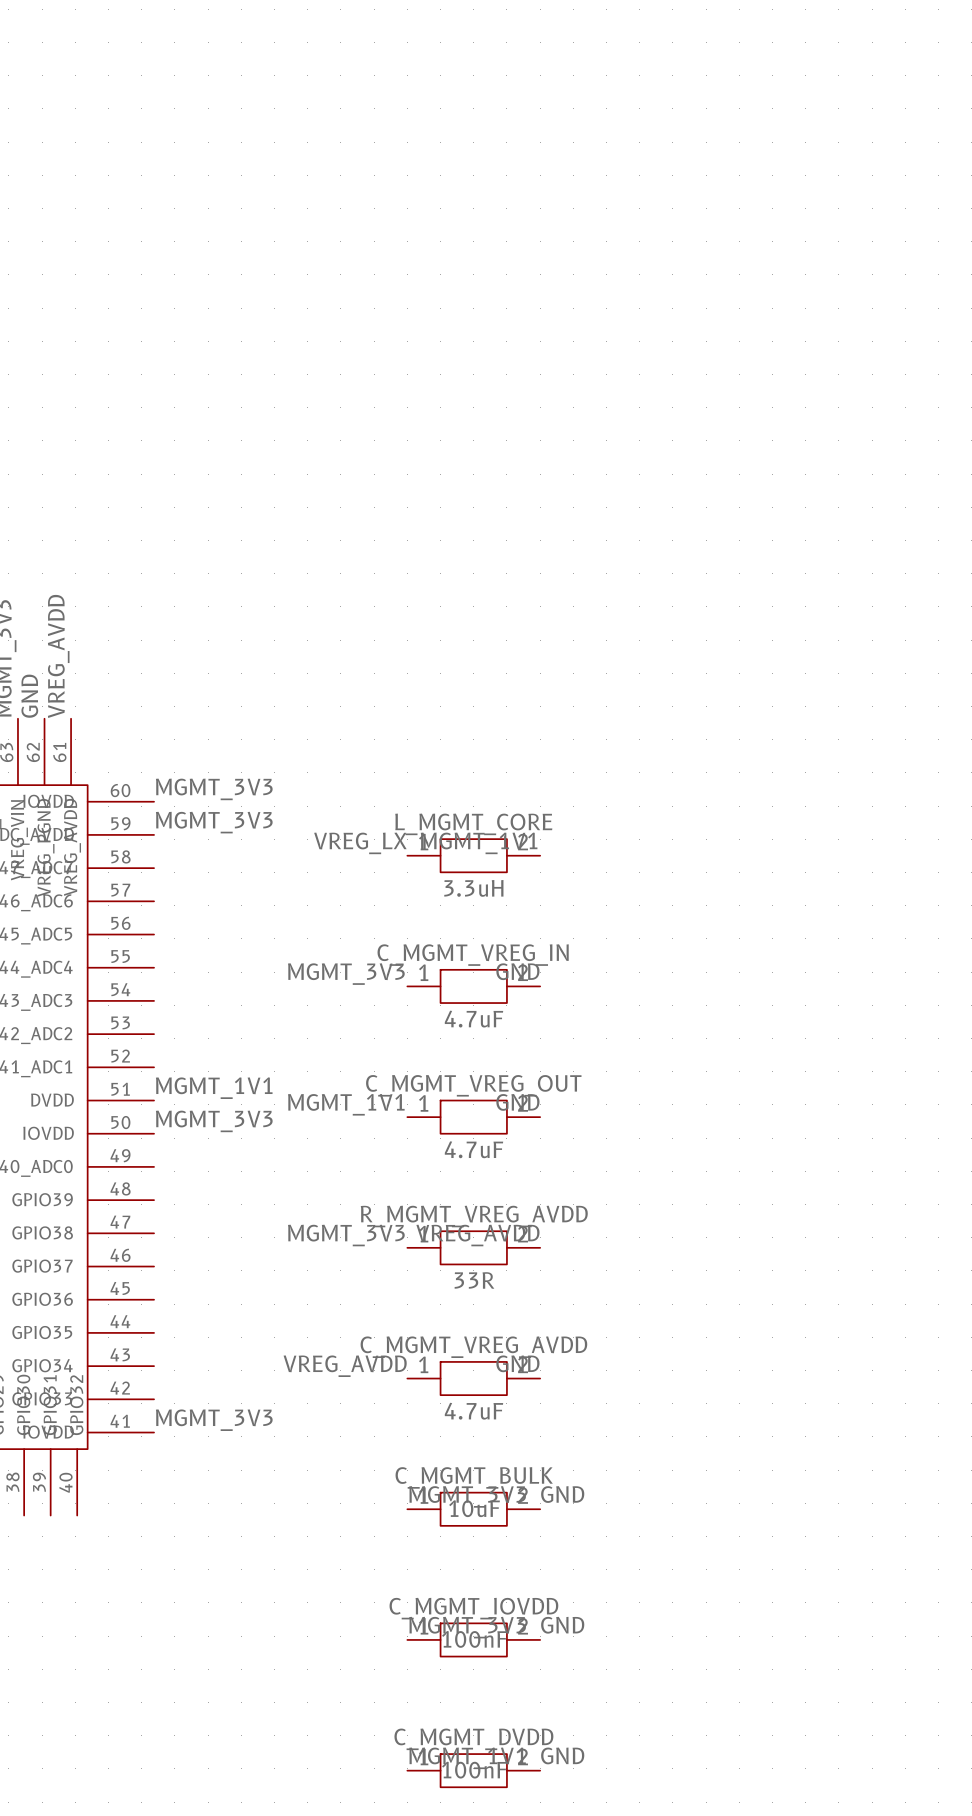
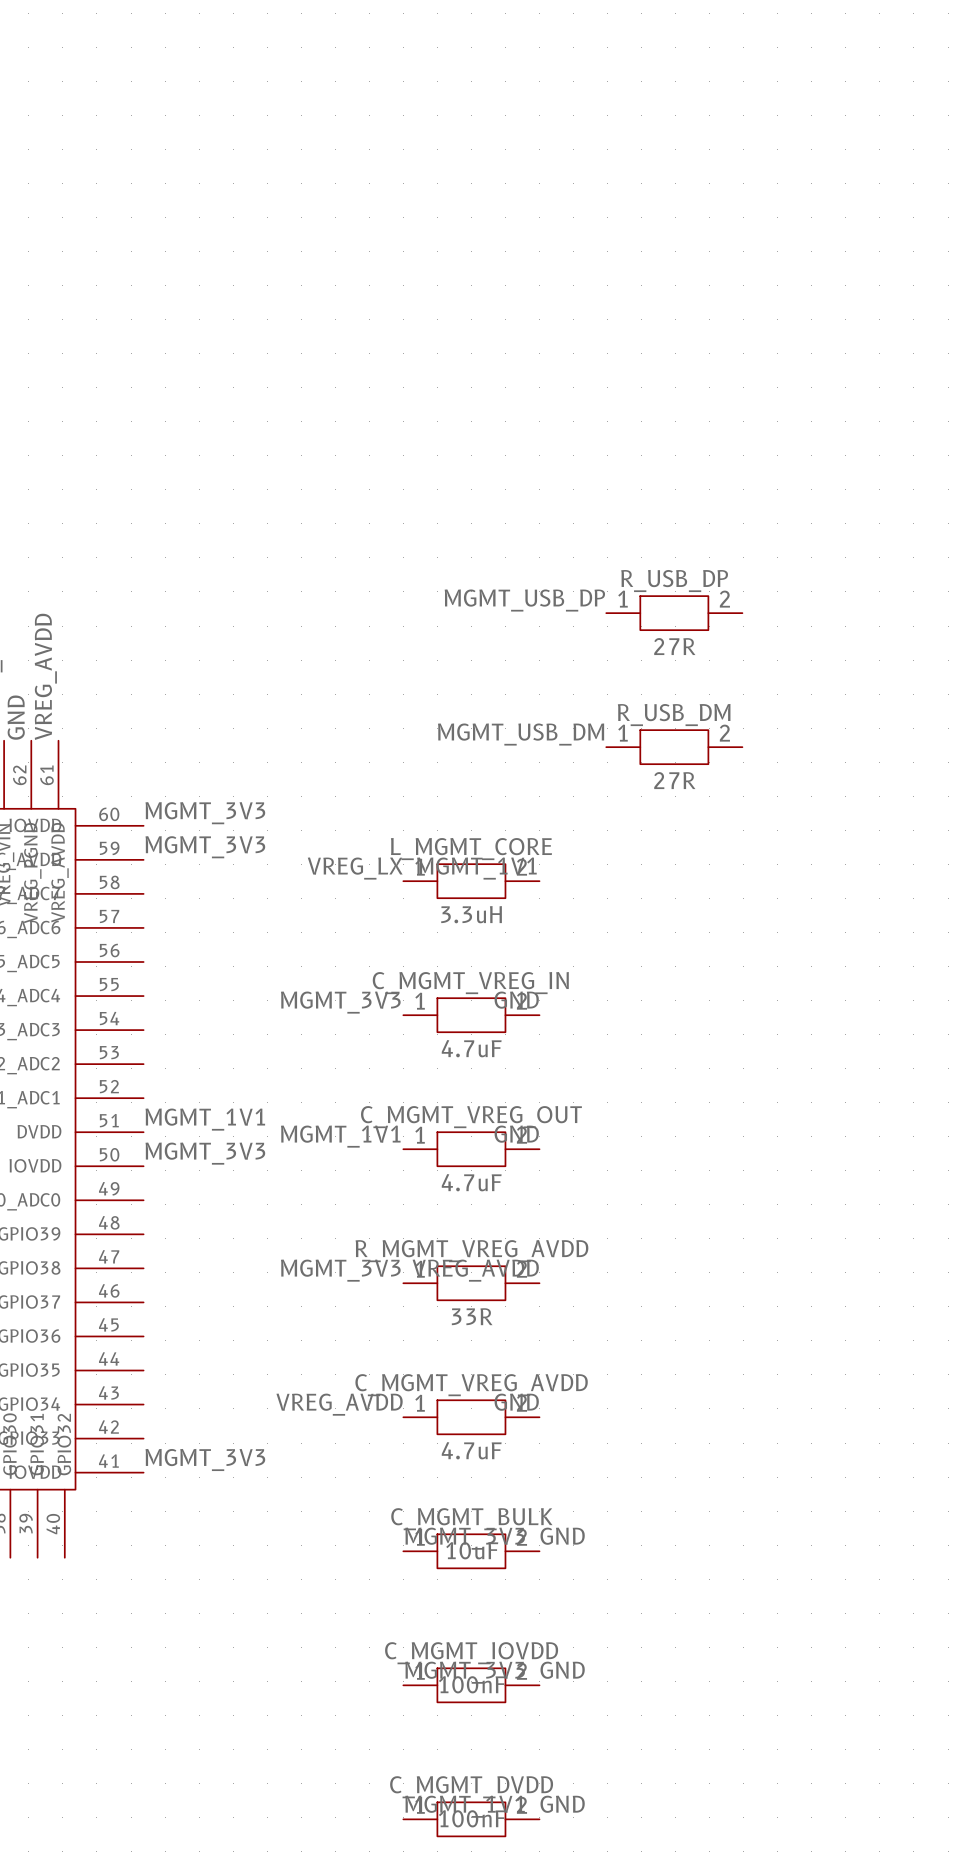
label: none -> MGMT_USB_DP (524, 600)
R_USB_DP: none -> 27R (674, 613)
label: none -> MGMT_USB_DM (521, 734)
R_USB_DM: none -> 27R (674, 747)

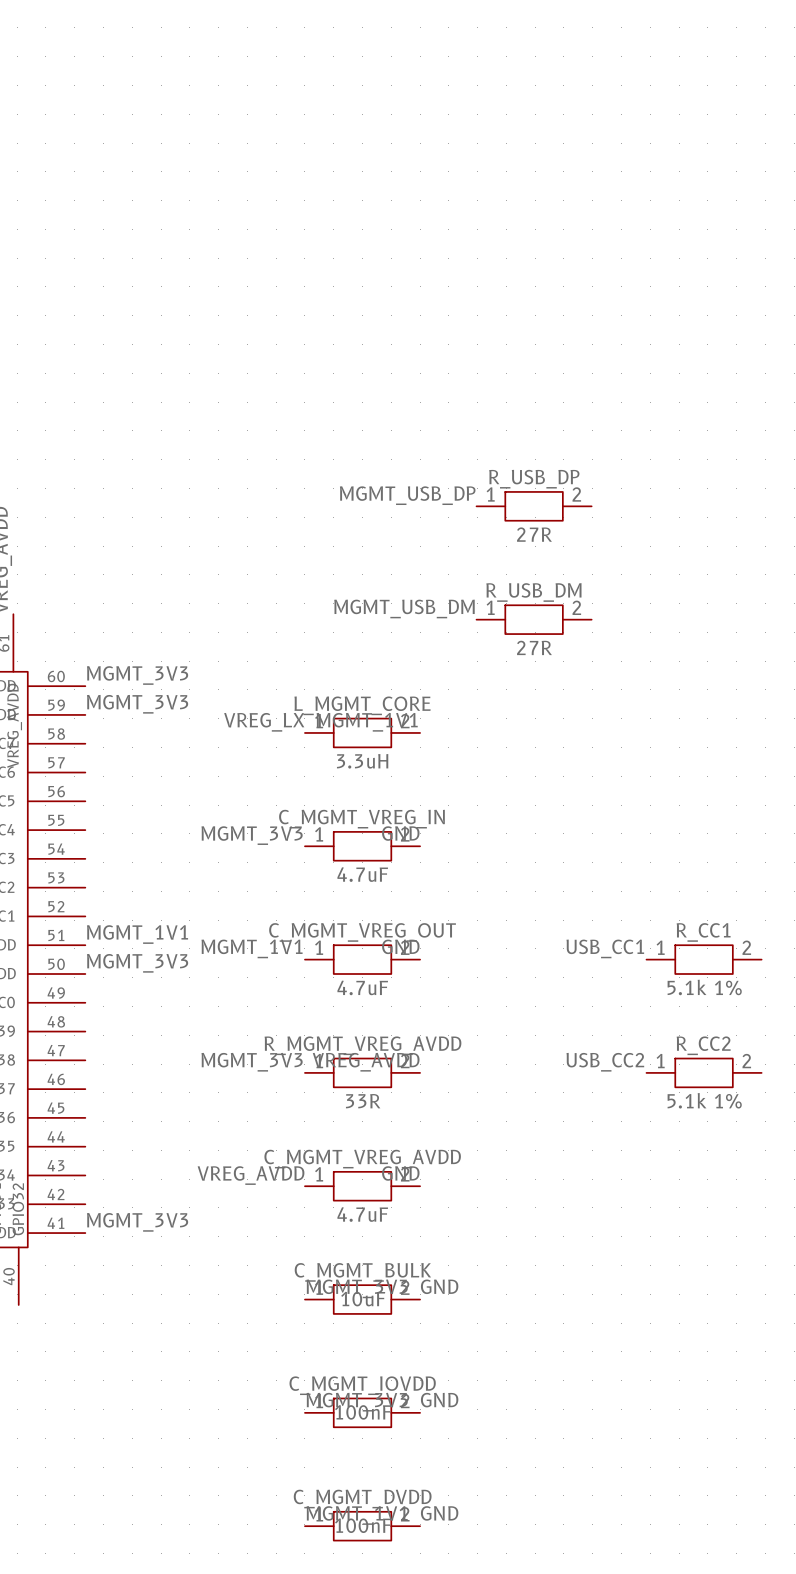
label: none -> USB_CC1 (605, 948)
R_CC1: none -> 5.1k 1% (704, 959)
label: none -> USB_CC2 (605, 1062)
R_CC2: none -> 5.1k 1% (704, 1072)

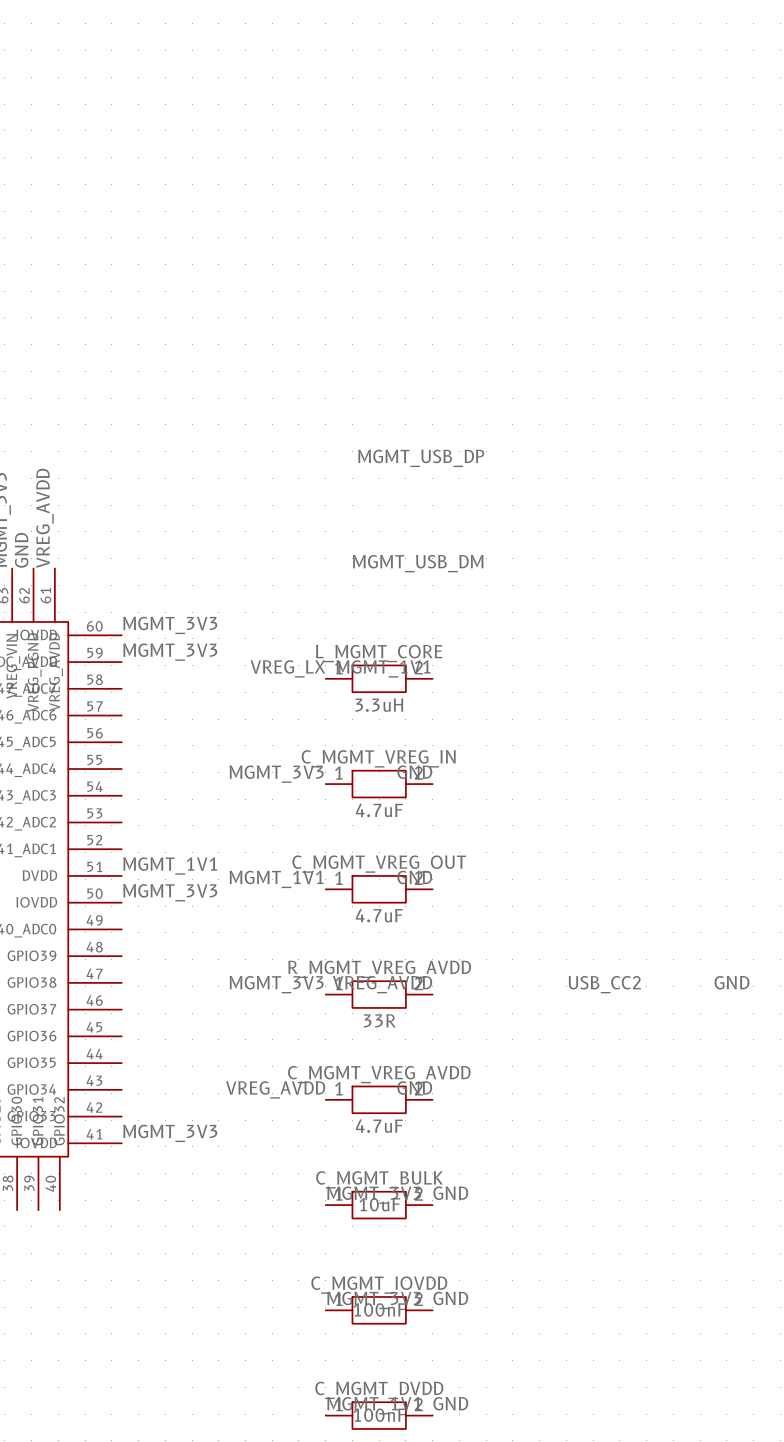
R_USB_DP: 27R (534, 506) -> none
R_USB_DM: 27R (534, 619) -> none
label: USB_CC1 (605, 948) -> none
R_CC1: 5.1k 1% (704, 959) -> none
label: none -> GND (732, 982)
R_CC2: 5.1k 1% (704, 1072) -> none

